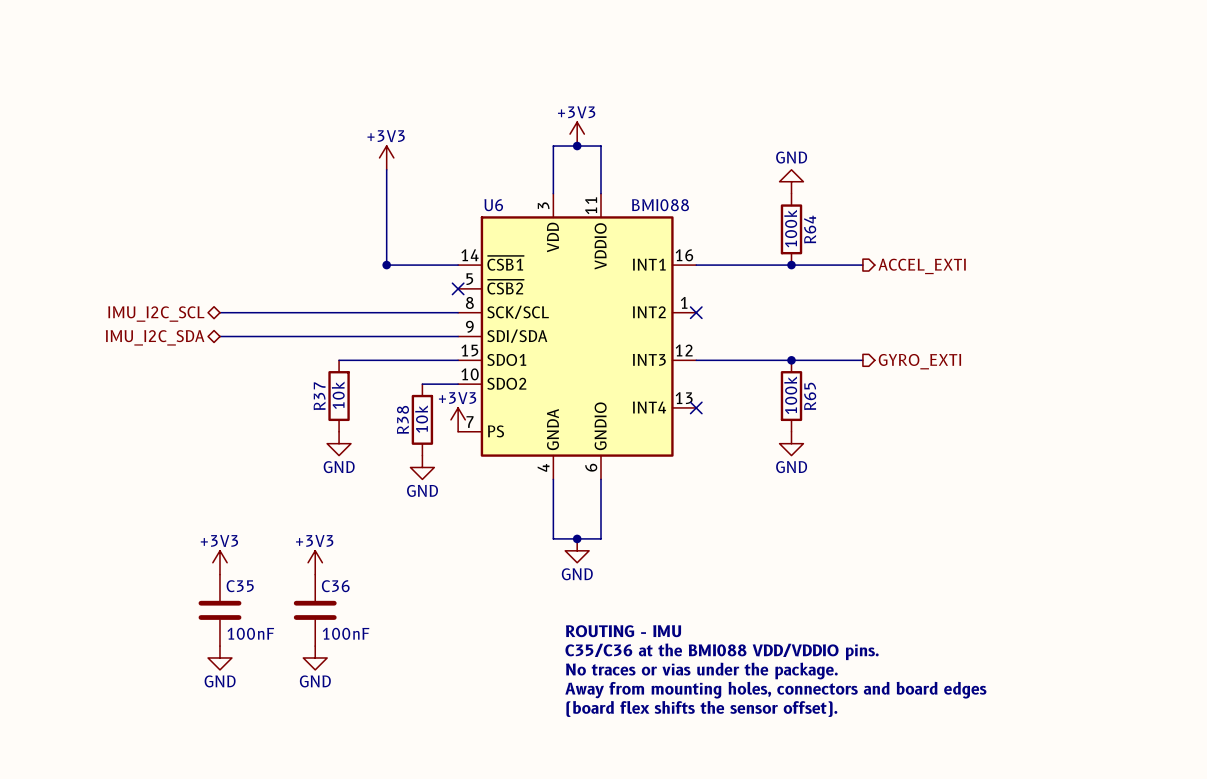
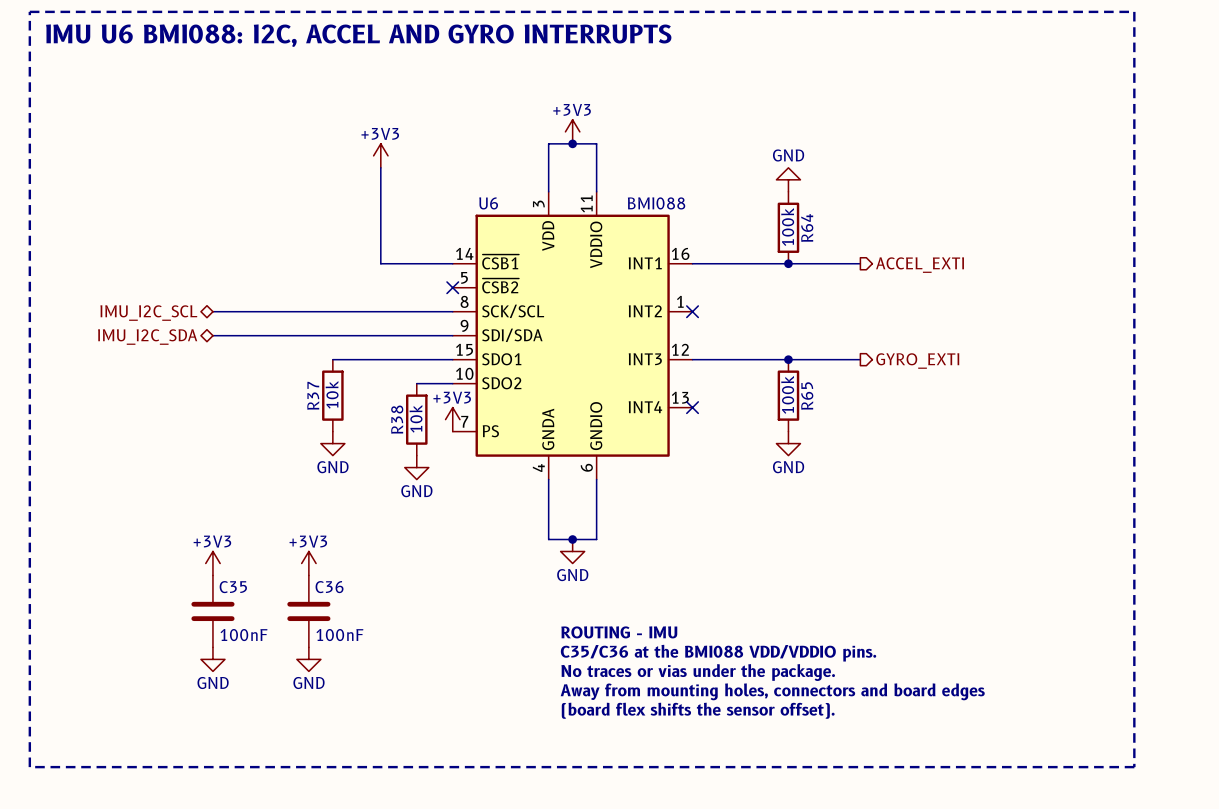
line: none -> (29, 11) (1134, 11) (1134, 767) (29, 767) (29, 11)
text: none -> IMU U6 BMI088: I2C, ACCEL AND GYRO INTERRUPTS (358, 35)
junction: (386, 265) -> none

